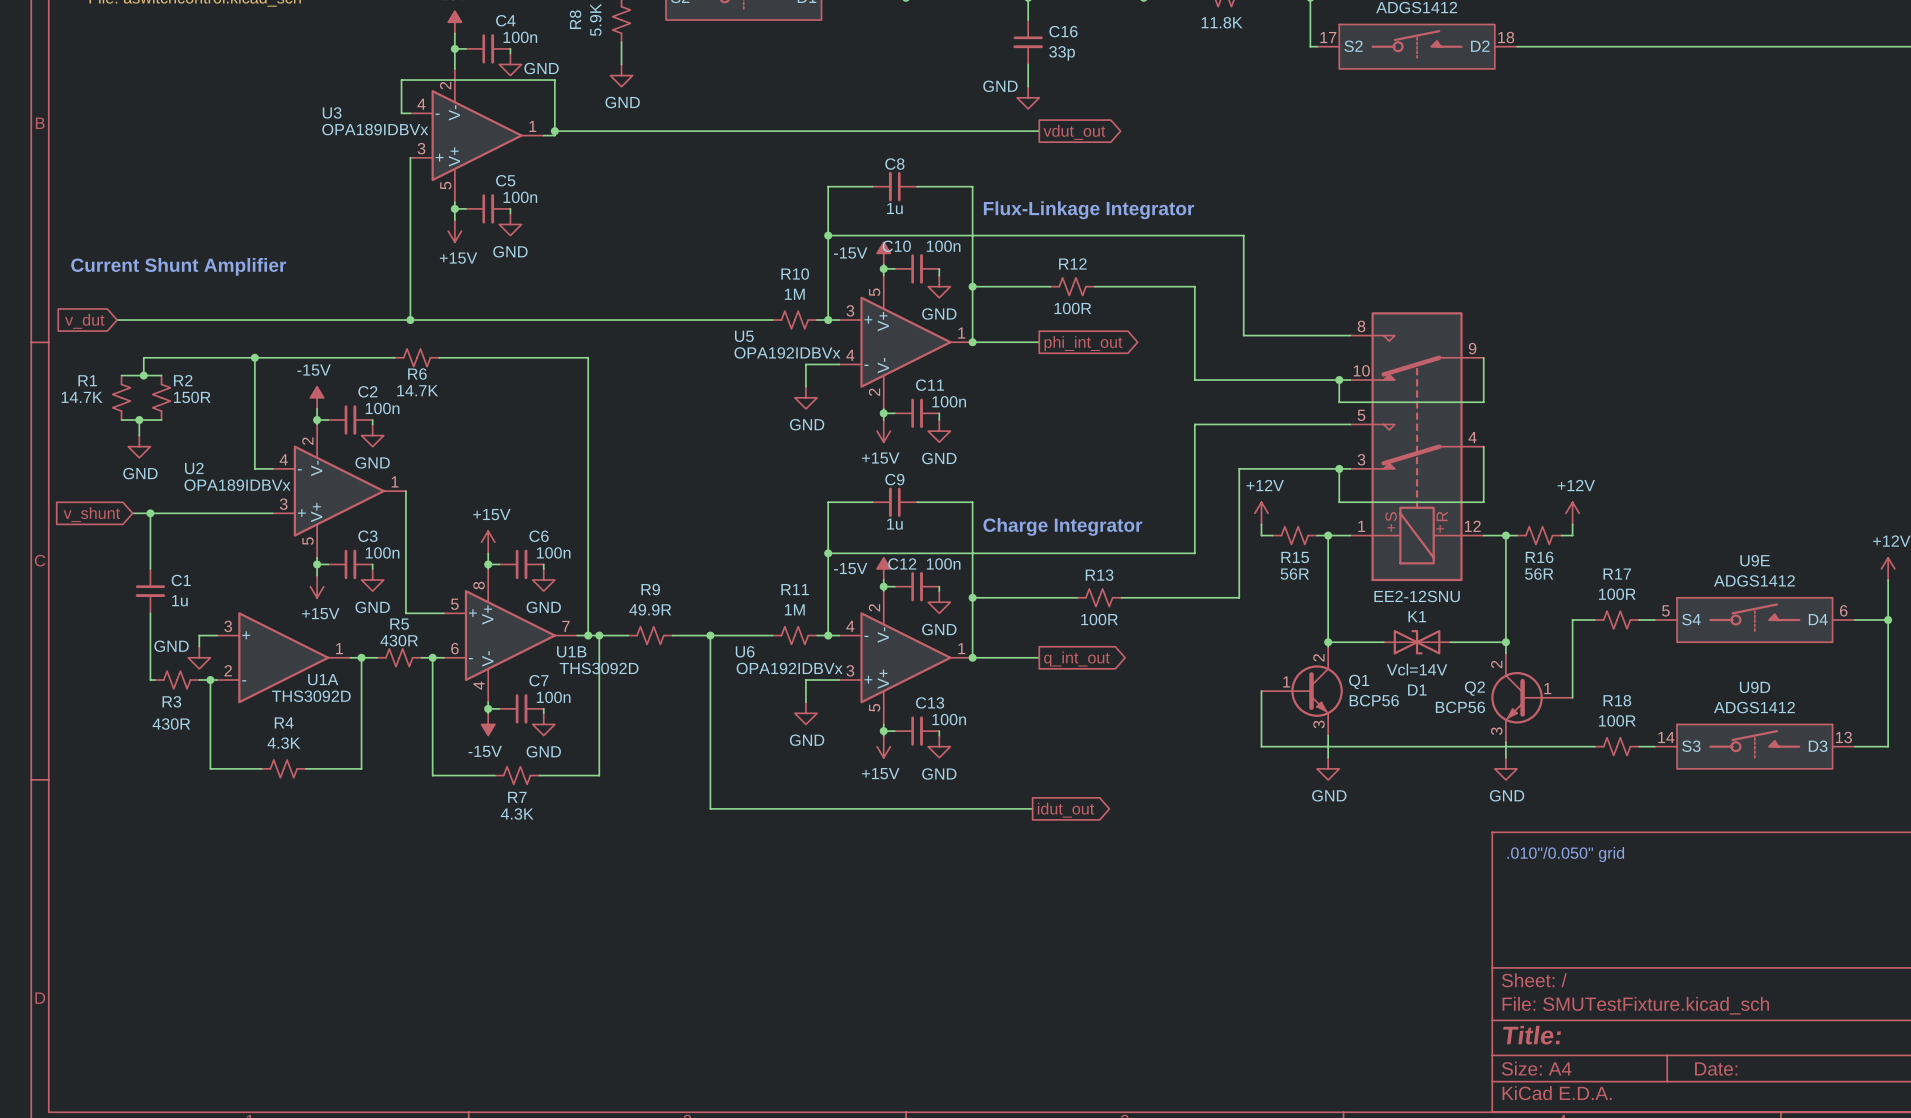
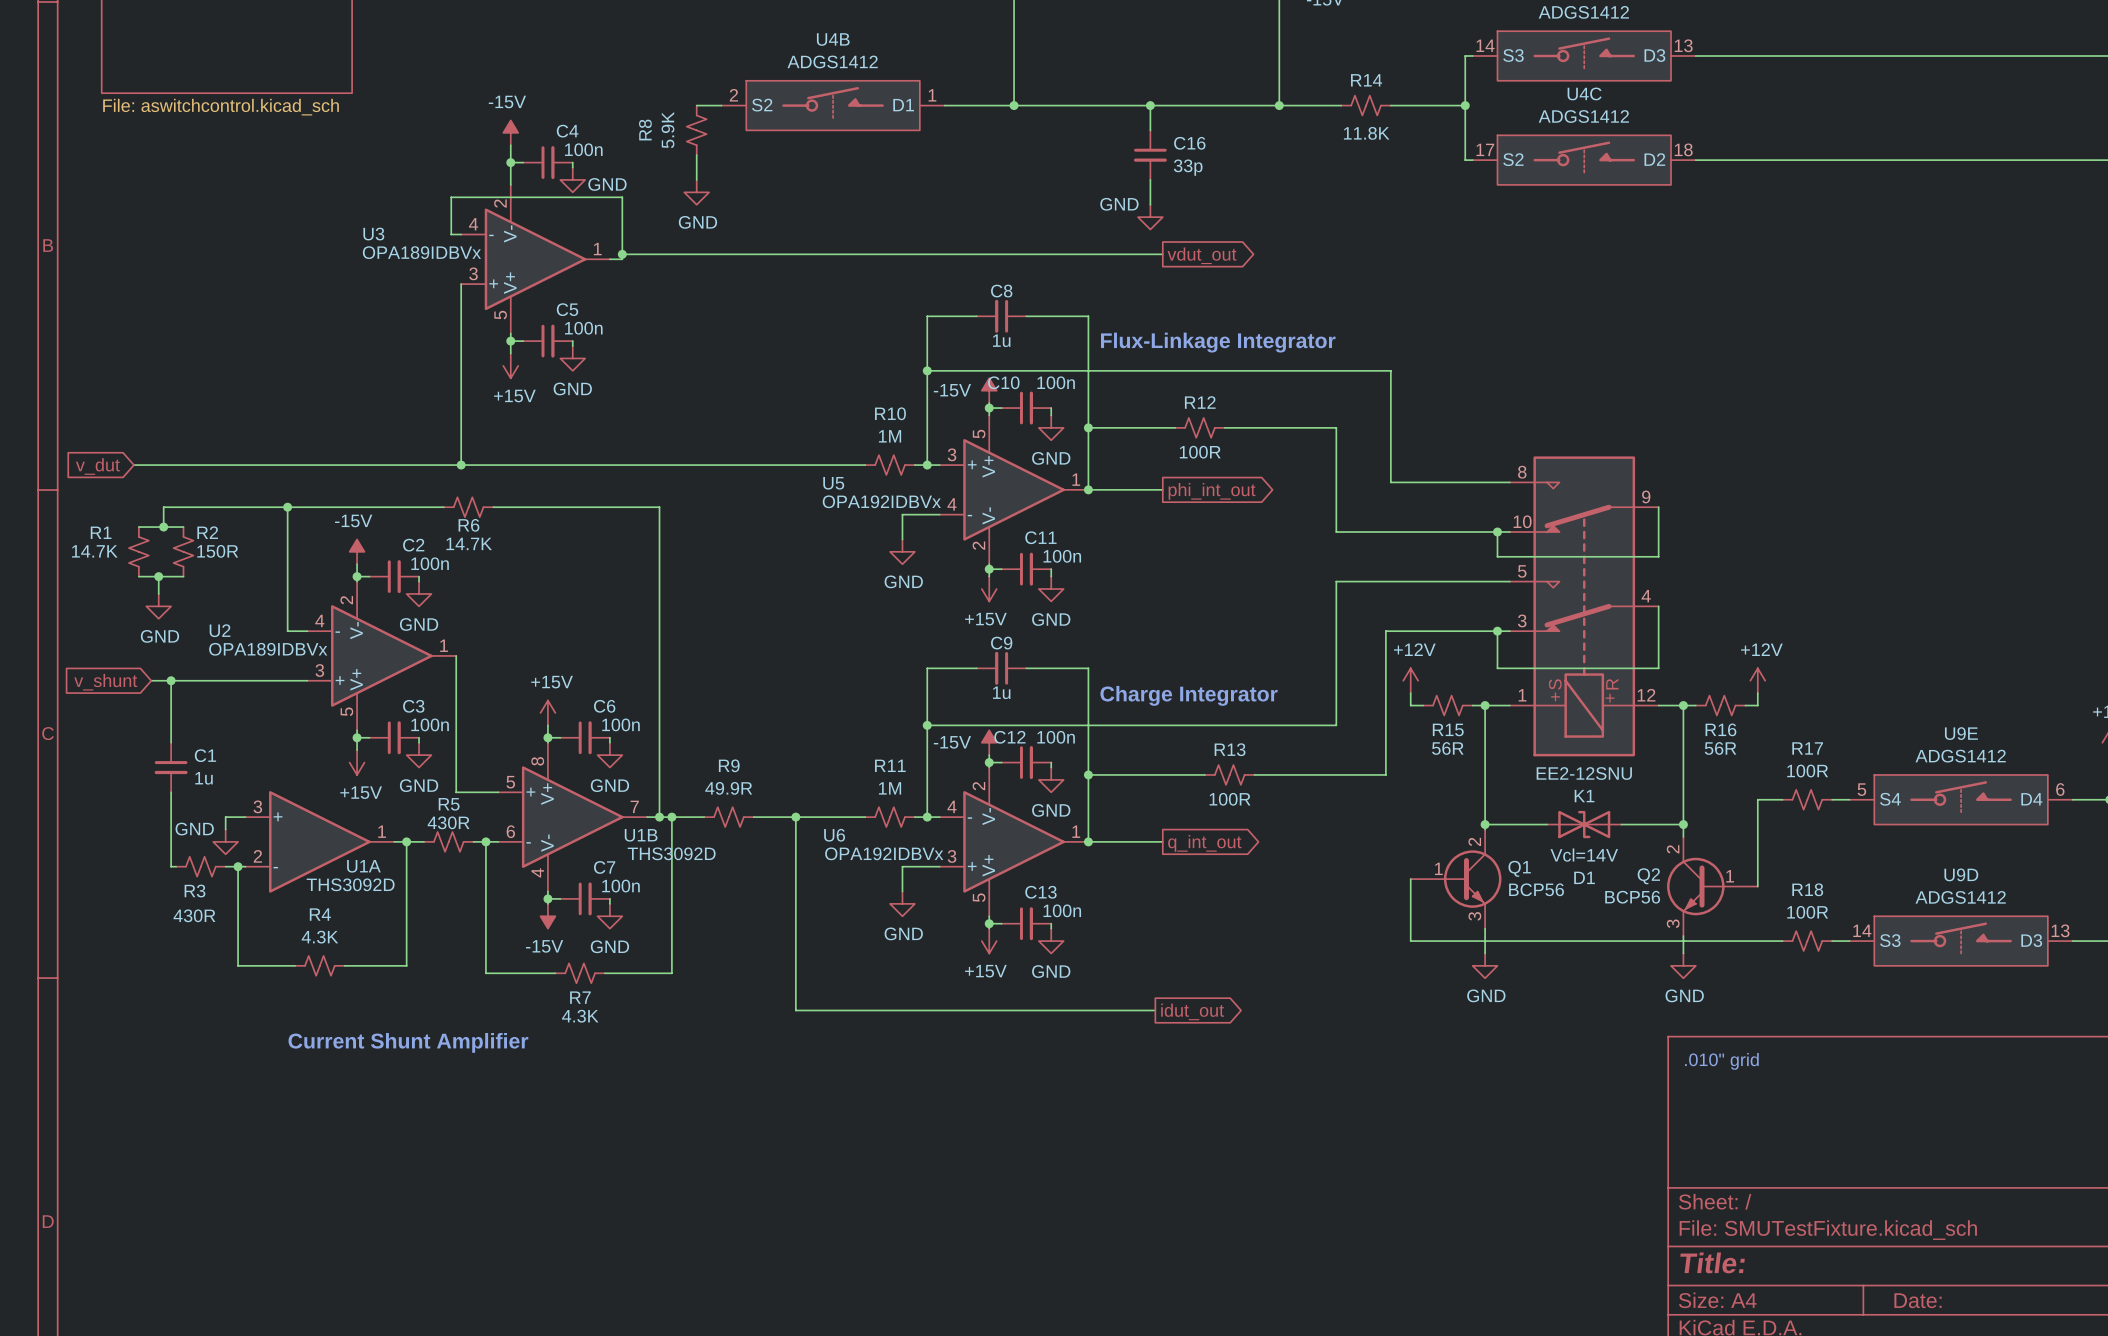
text: Current Shunt Amplifier (178, 266) -> none
text: none -> Current Shunt Amplifier (408, 1042)
text: .010"/0.050" grid (1565, 854) -> .010" grid (1721, 1061)

